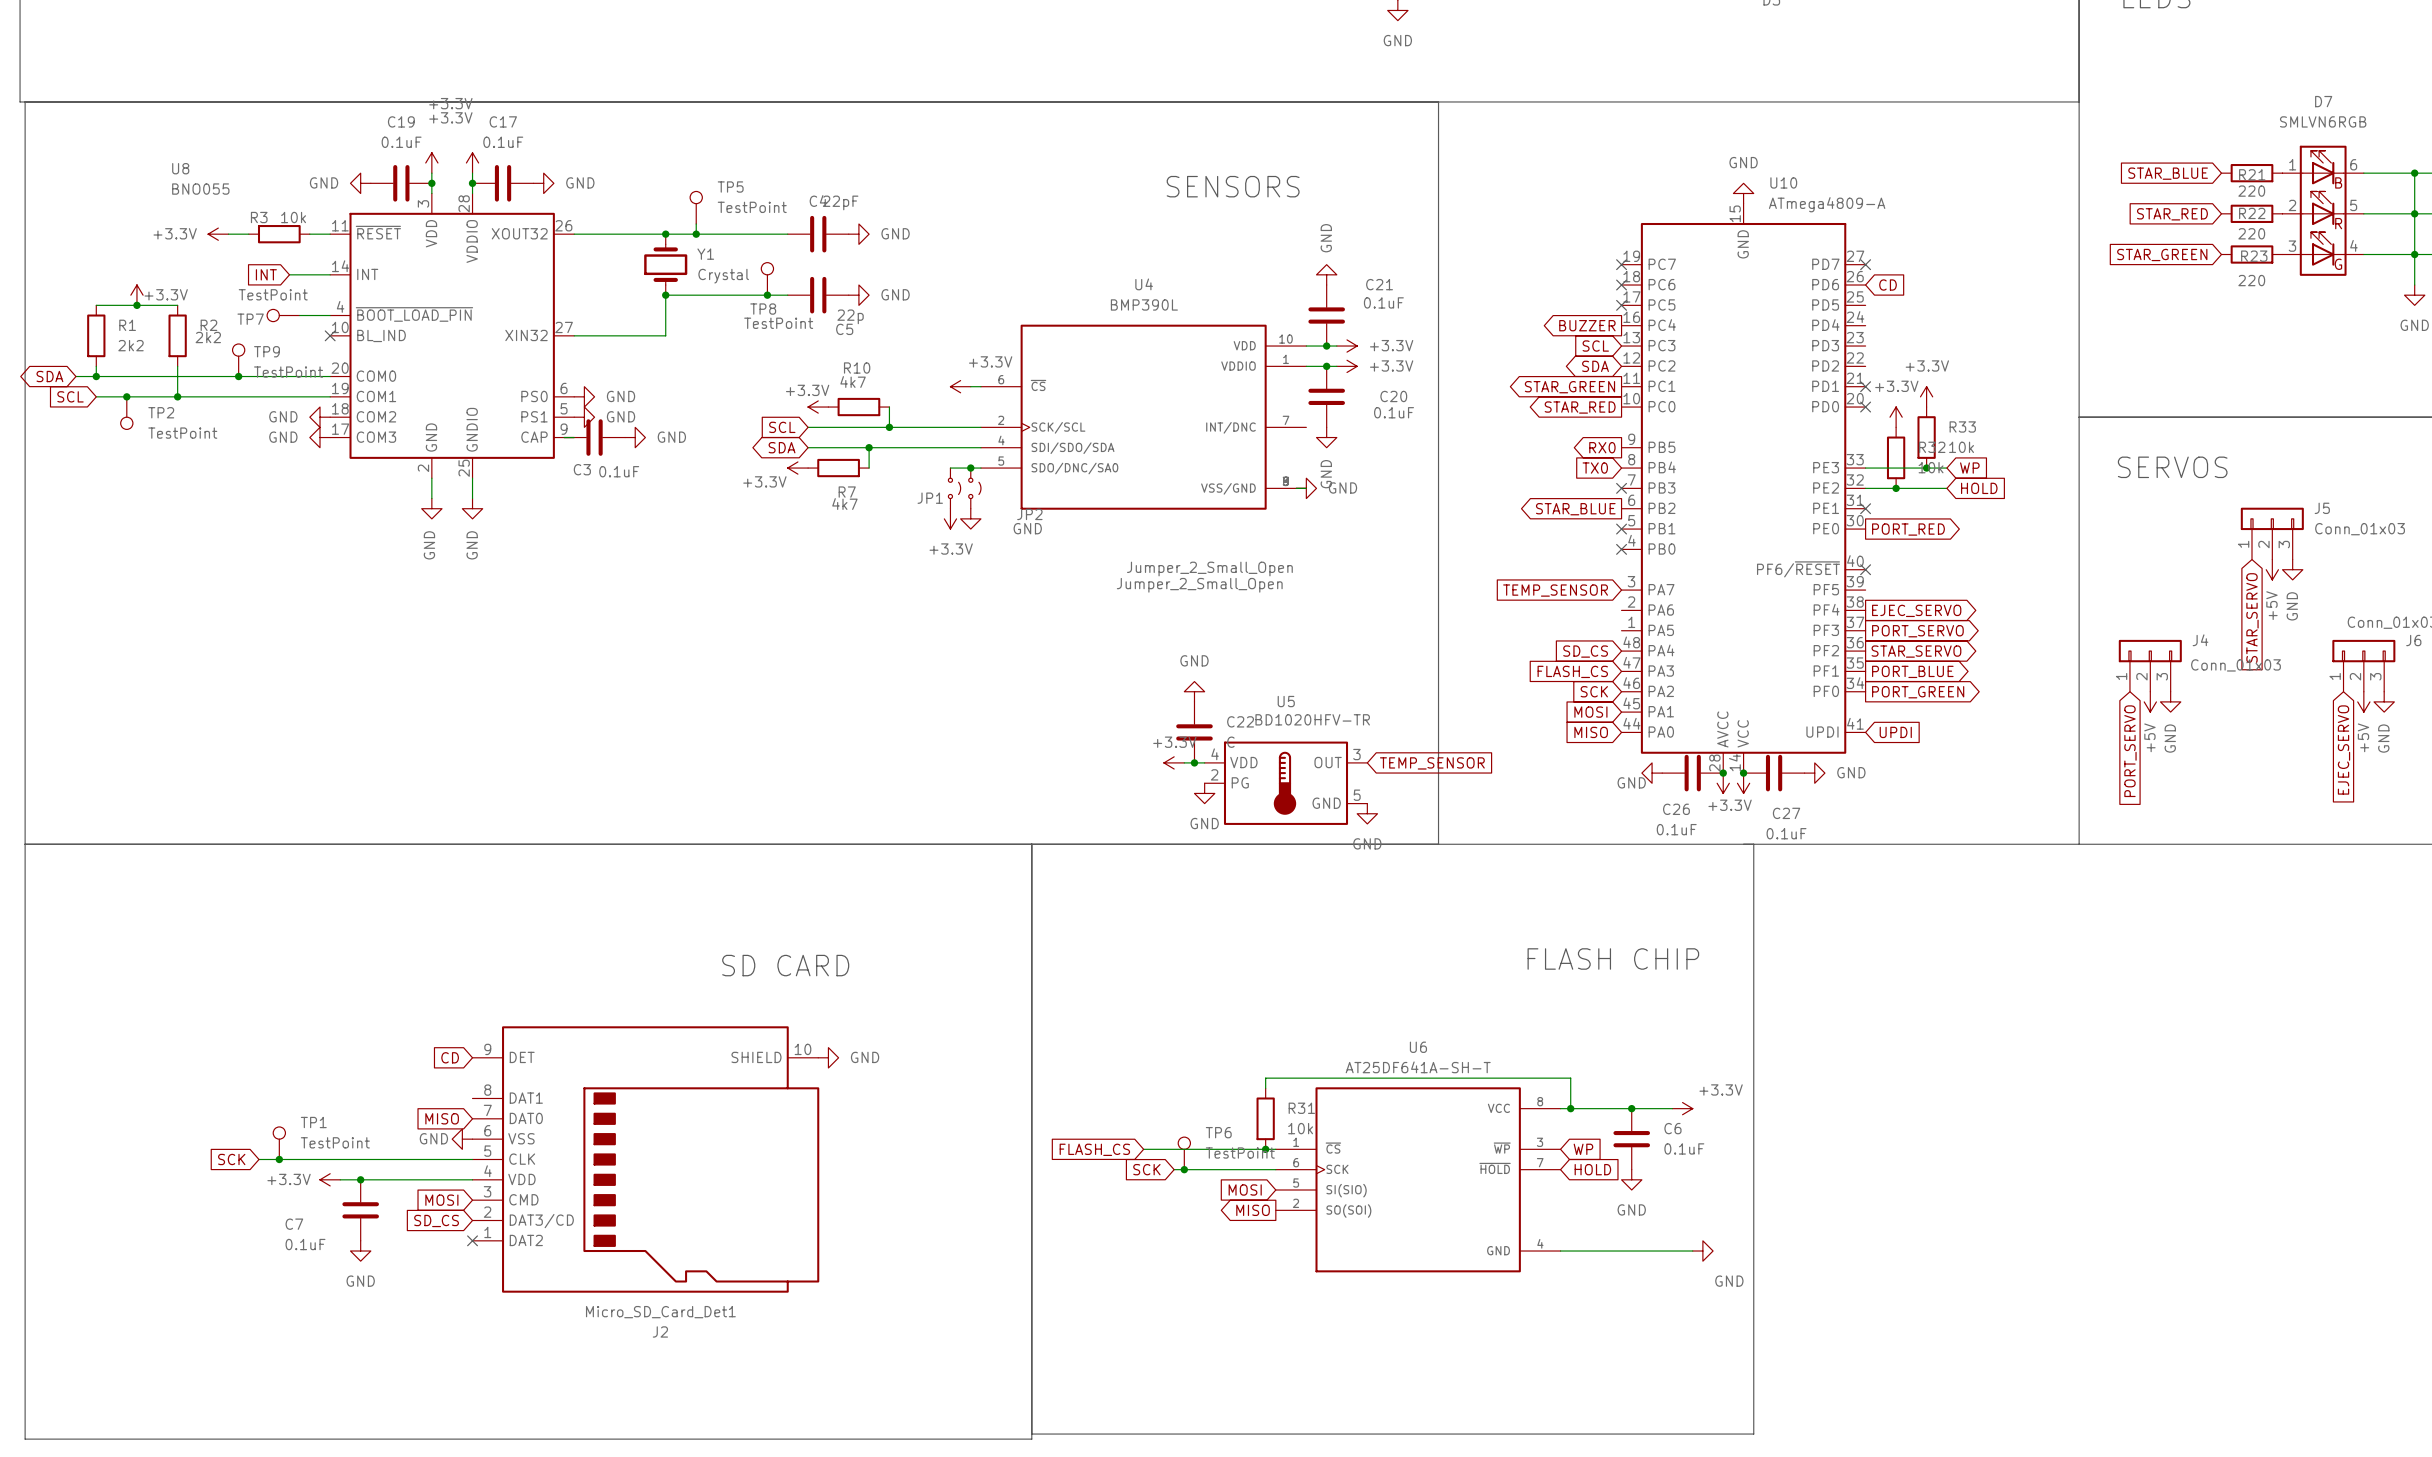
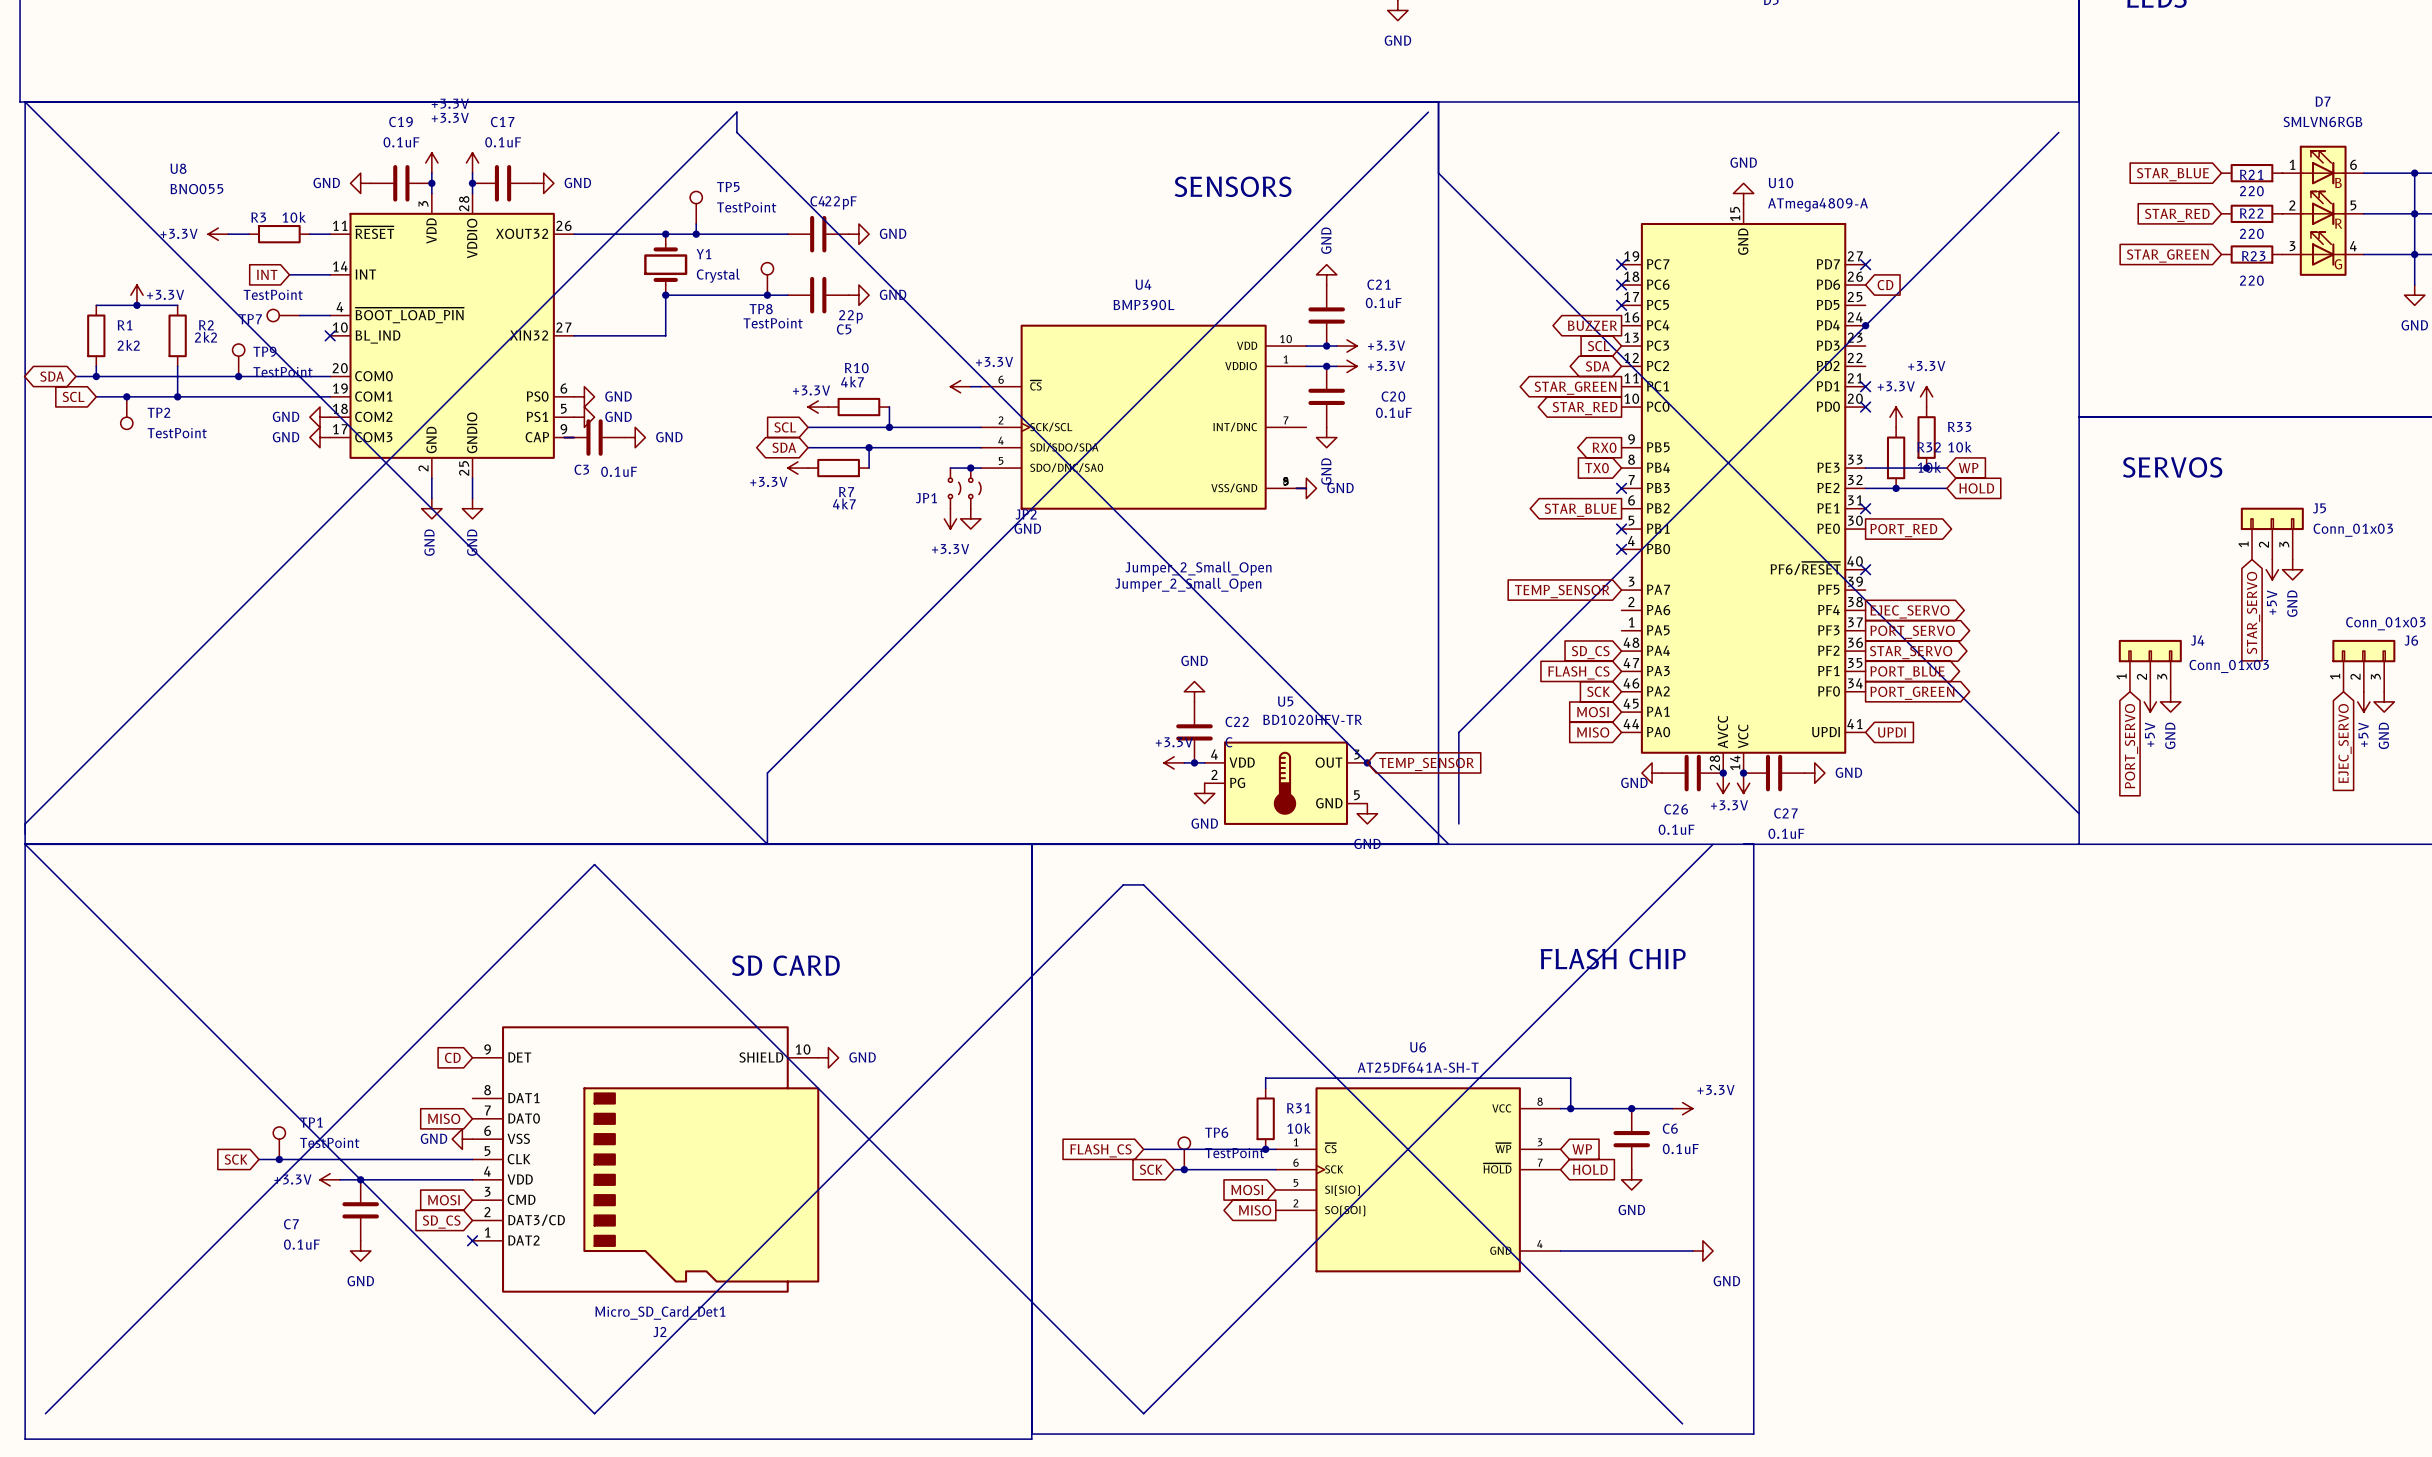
wire: none -> (25, 101) (767, 844) (767, 773) (1428, 112)
wire: none -> (1438, 101) (1438, 173) (2079, 813)
wire: none -> (2058, 132) (1458, 732) (1458, 823)
junction: none -> (1865, 325)
junction: none -> (1367, 762)
wire: none -> (25, 834) (25, 823) (736, 112) (736, 132) (1448, 844)
wire: none -> (25, 844) (594, 1413) (1123, 884) (1143, 884) (1682, 1423)
wire: none -> (1713, 844) (1143, 1413) (594, 864) (45, 1413)

